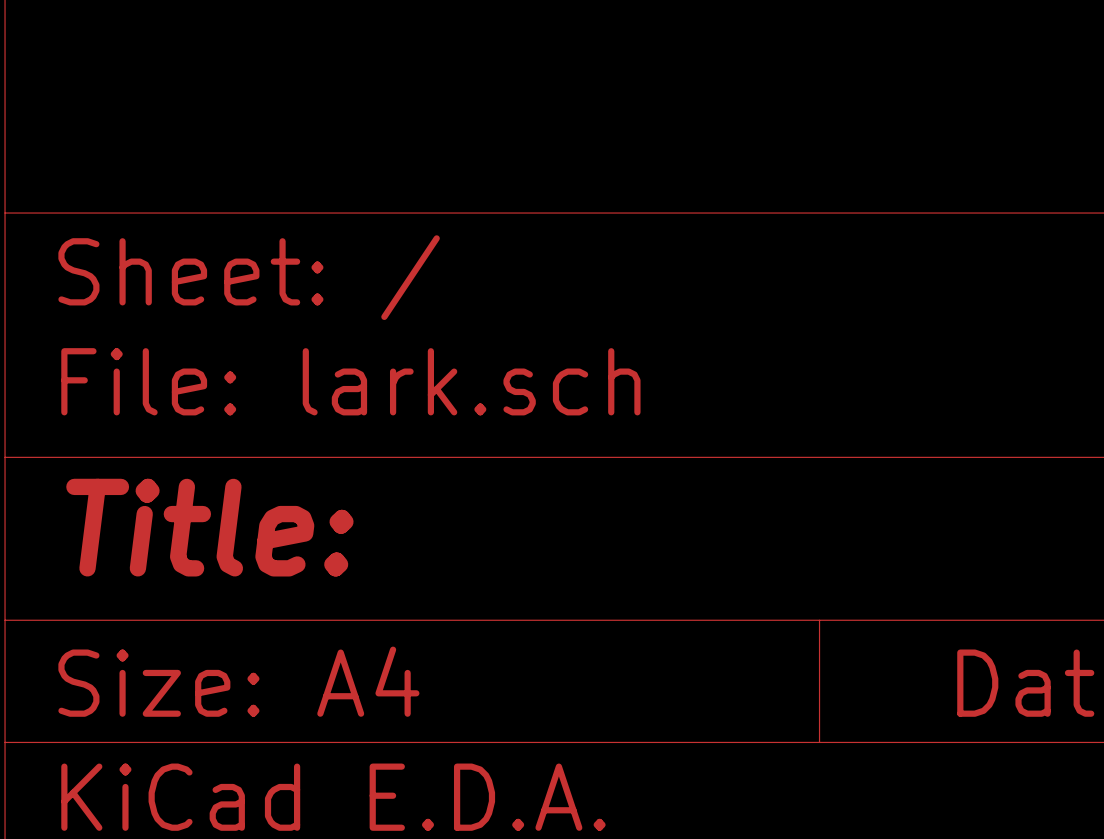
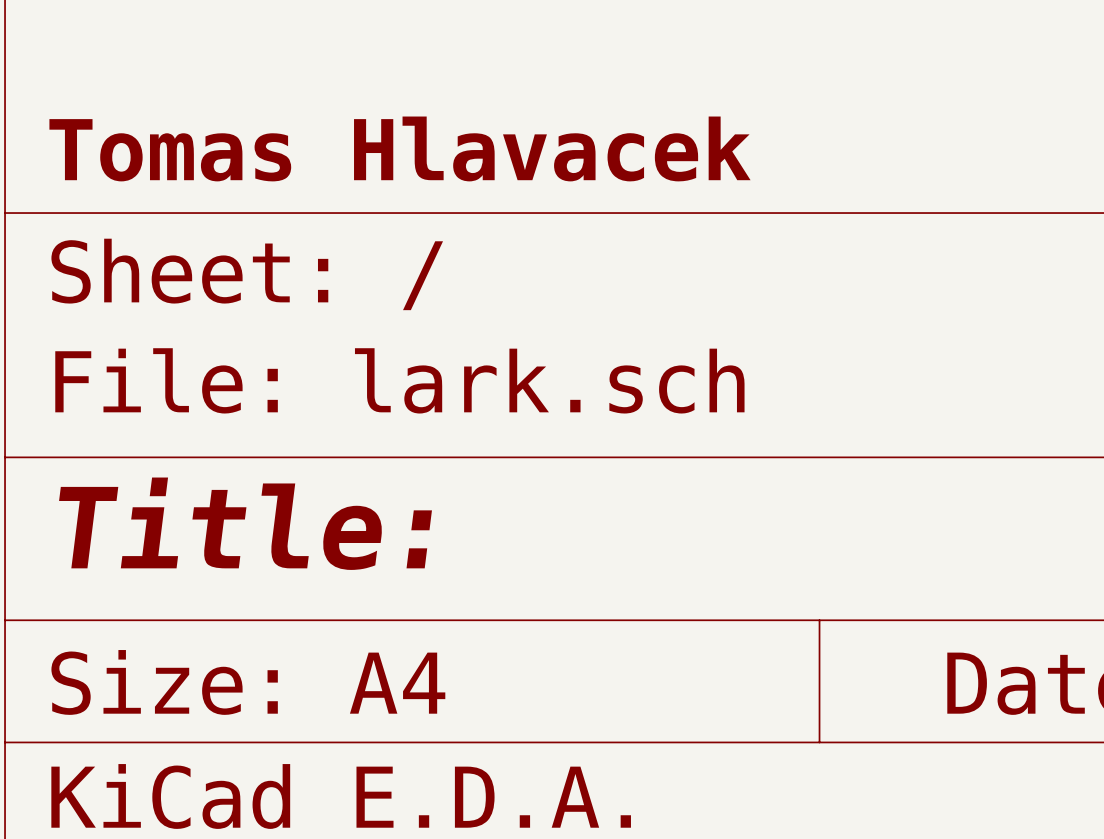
title block: none -> Tomas Hlavacek (399, 148)

